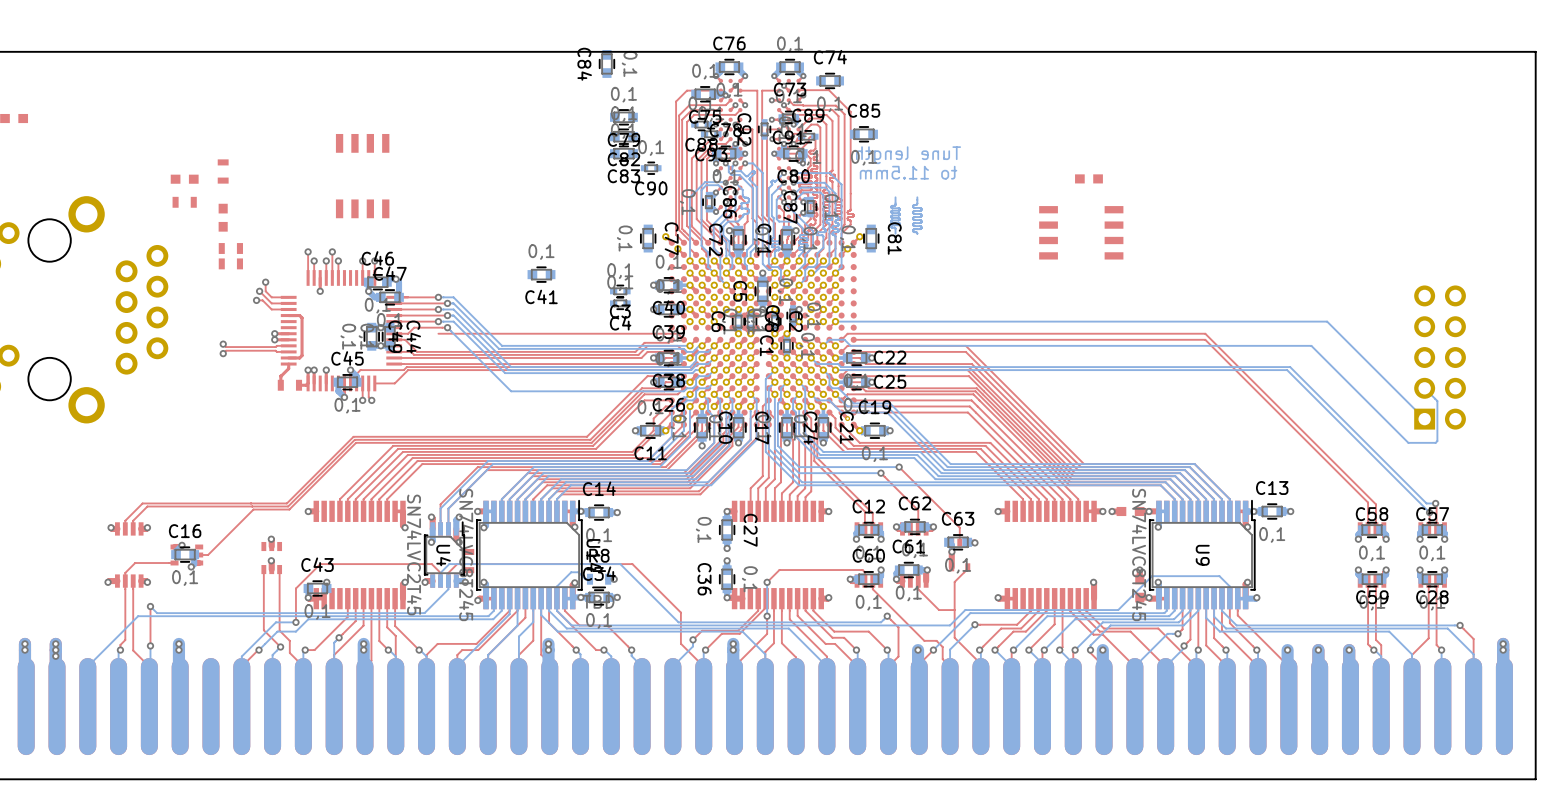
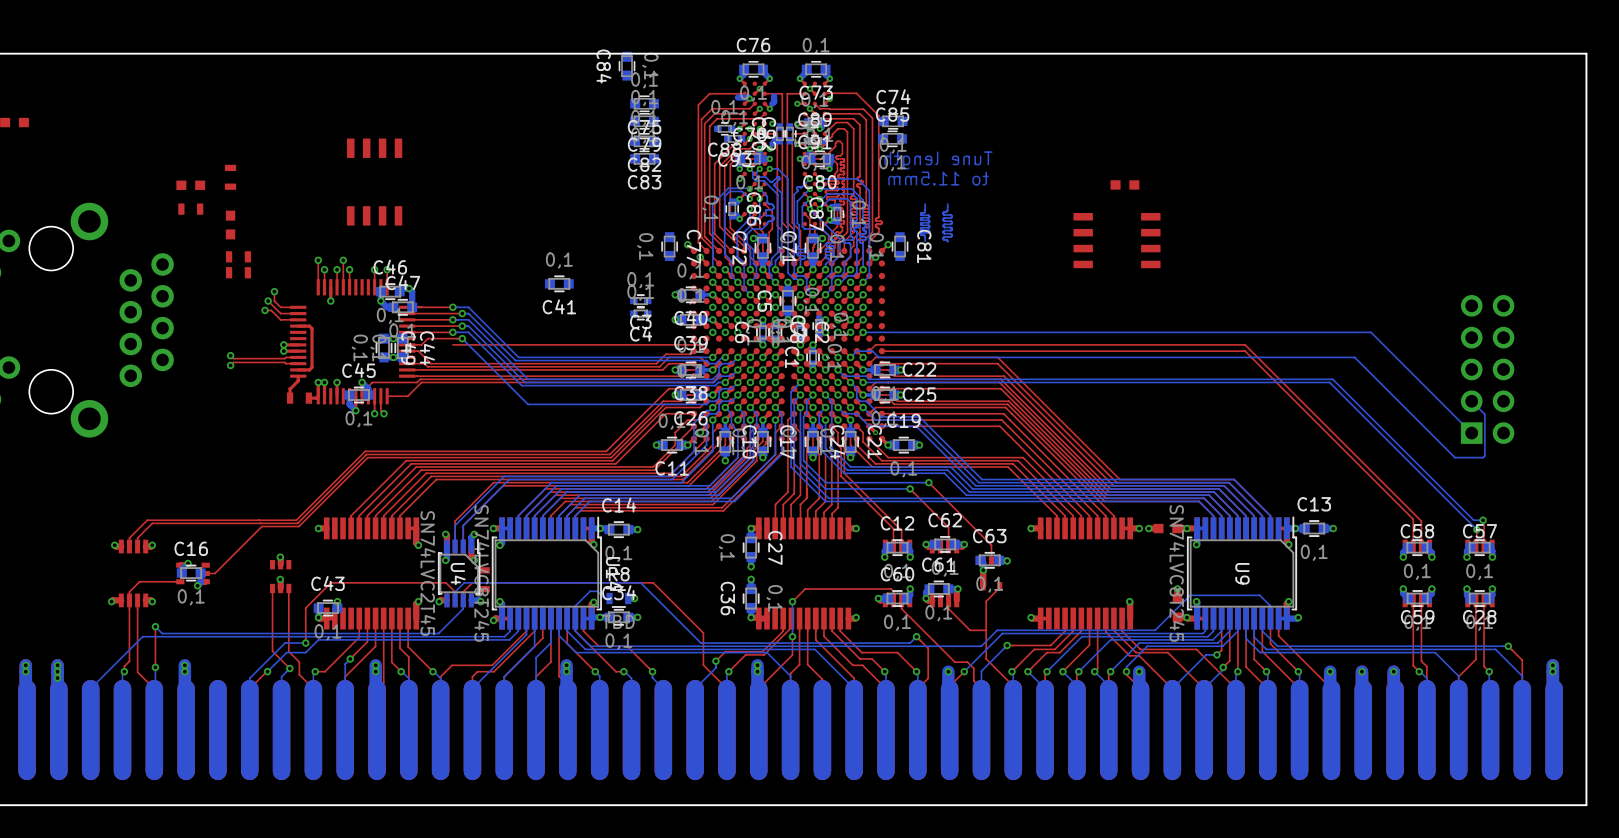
C74 position: (830, 80) -> (893, 121)
bottom track: none -> (774, 96) (772, 103)
C75 position: (705, 94) -> (644, 103)
via: none -> (772, 123)
bottom track: none -> (779, 140) (775, 140) (772, 143)
C89 position: (808, 136) -> (814, 141)
C90 rotation: 0° (651, 168) -> 90° clockwise (779, 133)
C90 position: (651, 168) -> (779, 133)

